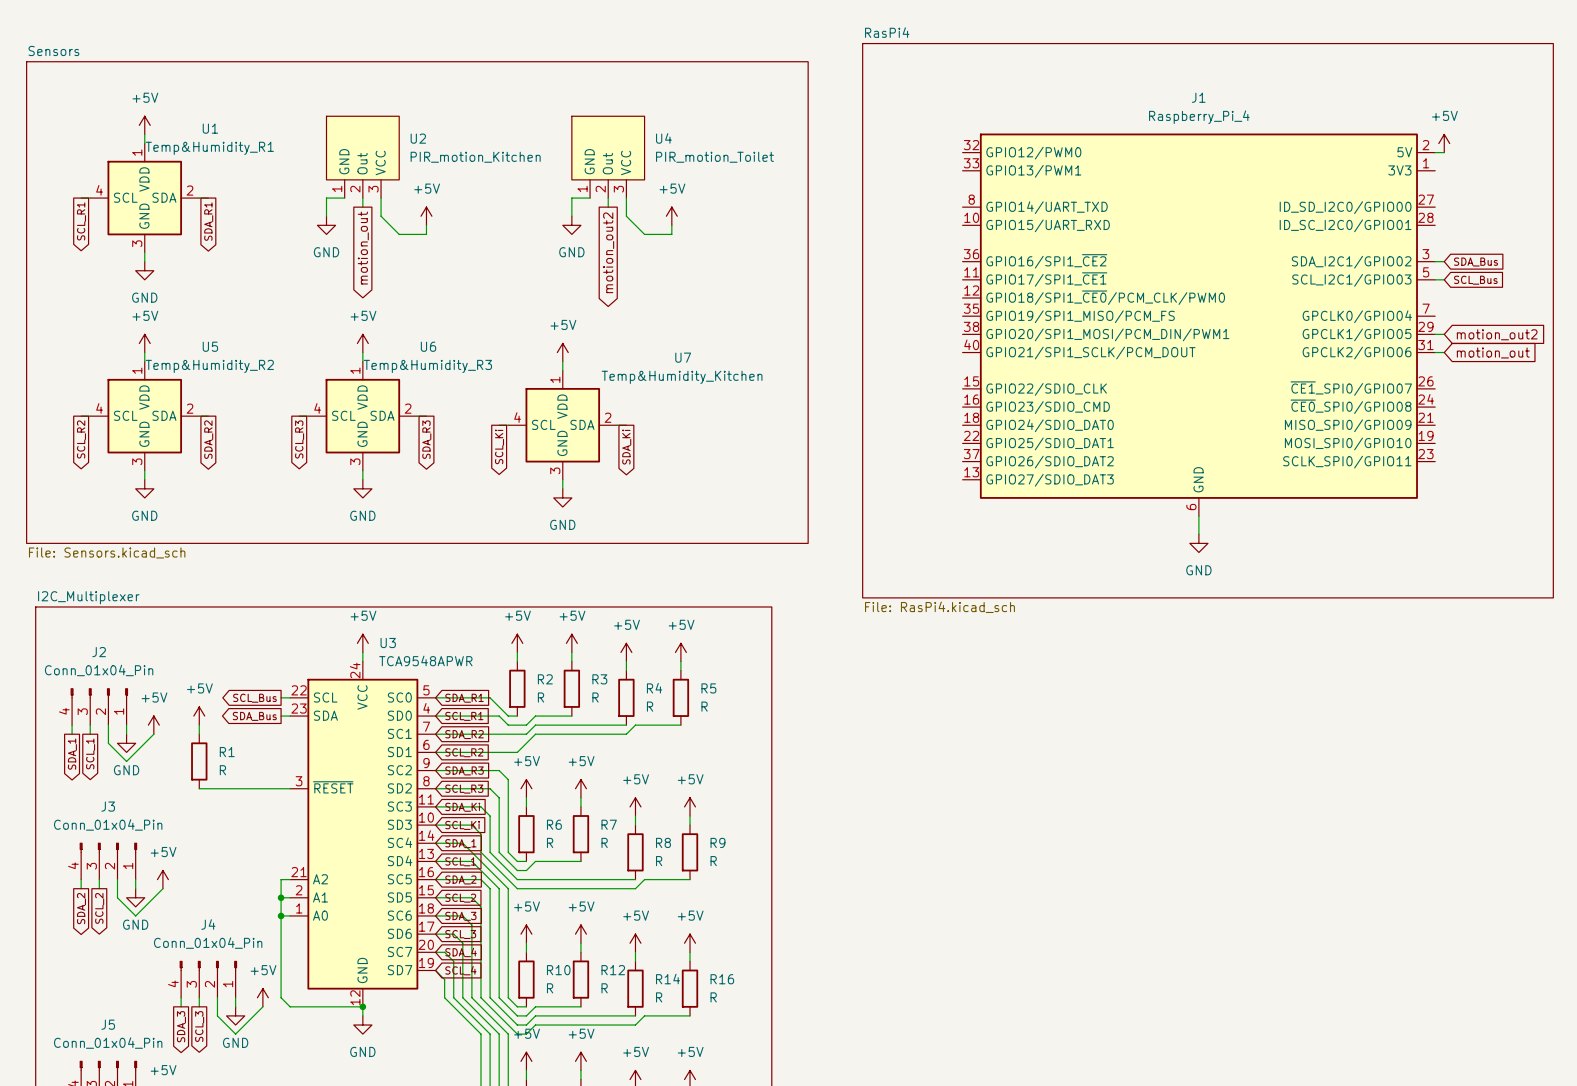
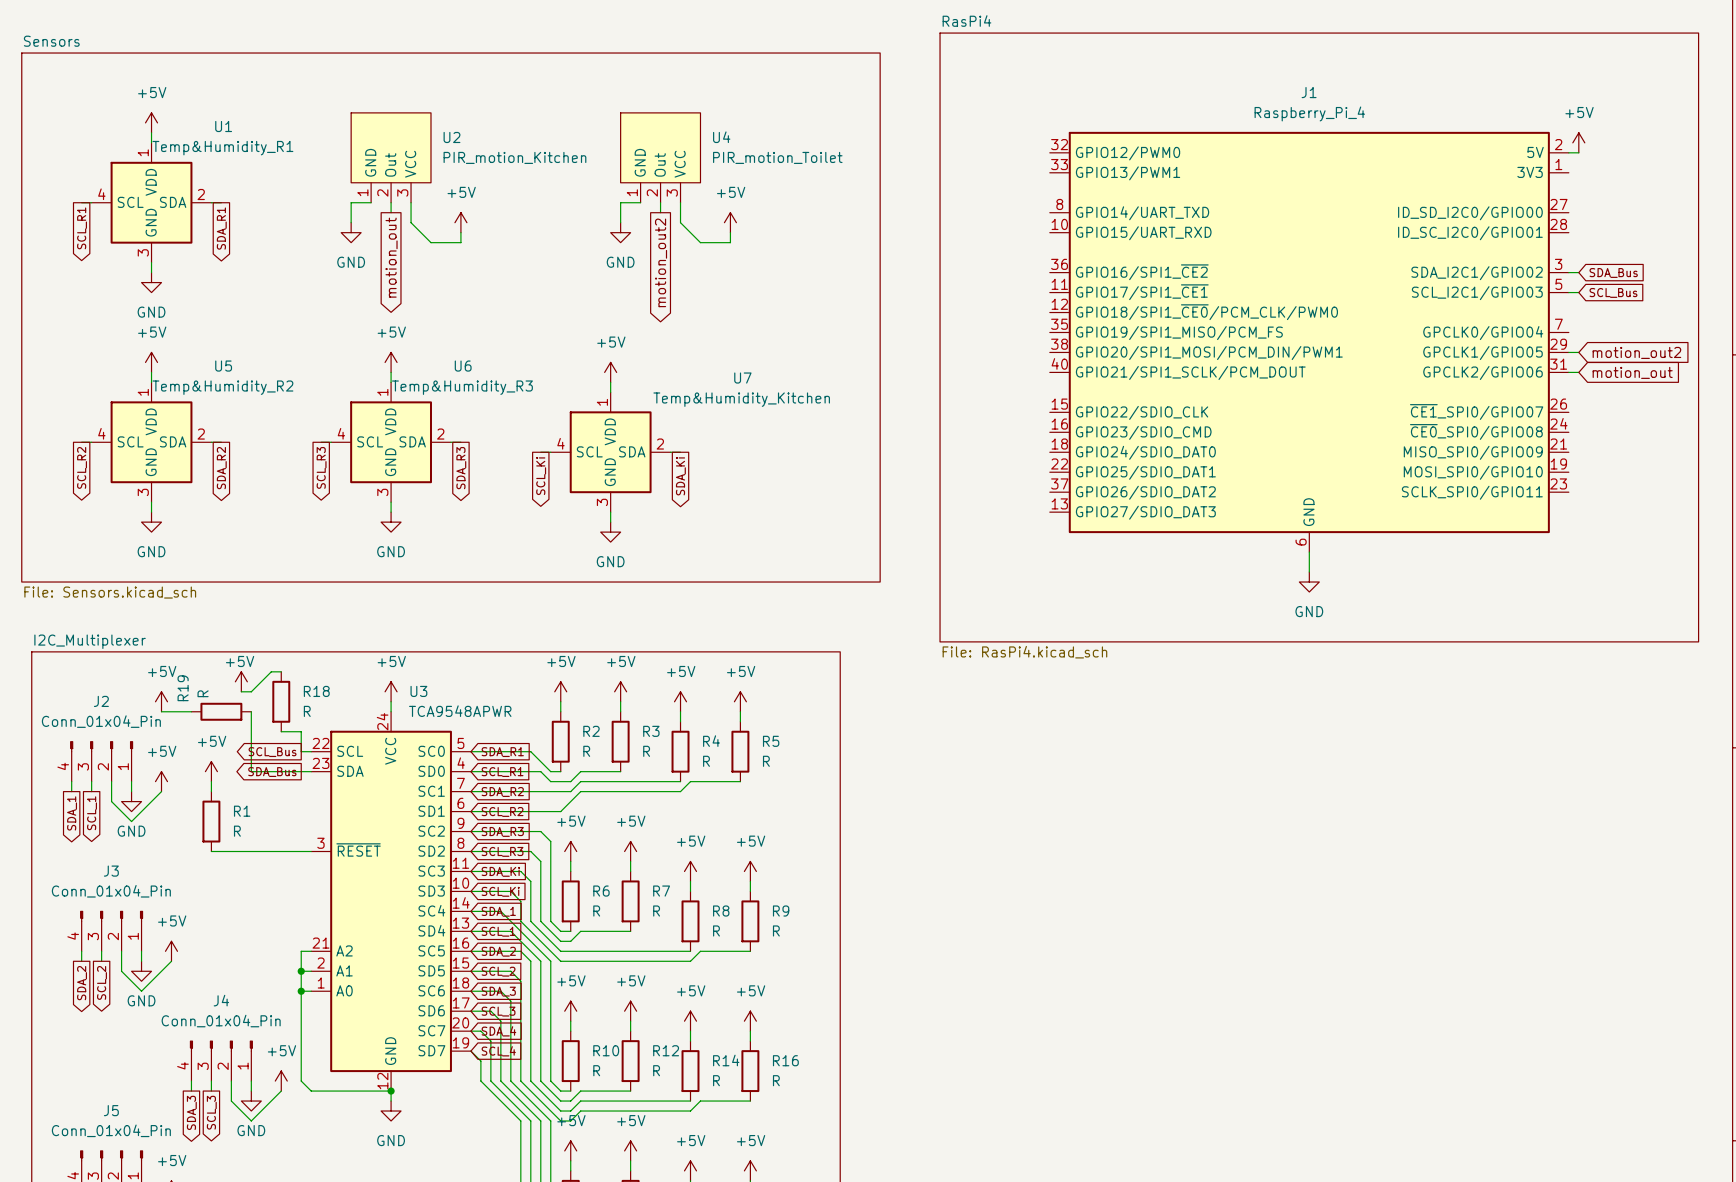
wire: none -> (281, 671) (271, 671) (251, 691) (241, 691)
power symbol: none -> +5V (241, 681)
power symbol: none -> +5V (161, 701)
R18: none -> R (281, 701)
wire: none -> (161, 711) (191, 711)
R19: none -> R (221, 711)
wire: none -> (251, 711) (251, 771) (301, 771)
wire: none -> (281, 731) (301, 731) (301, 751)

